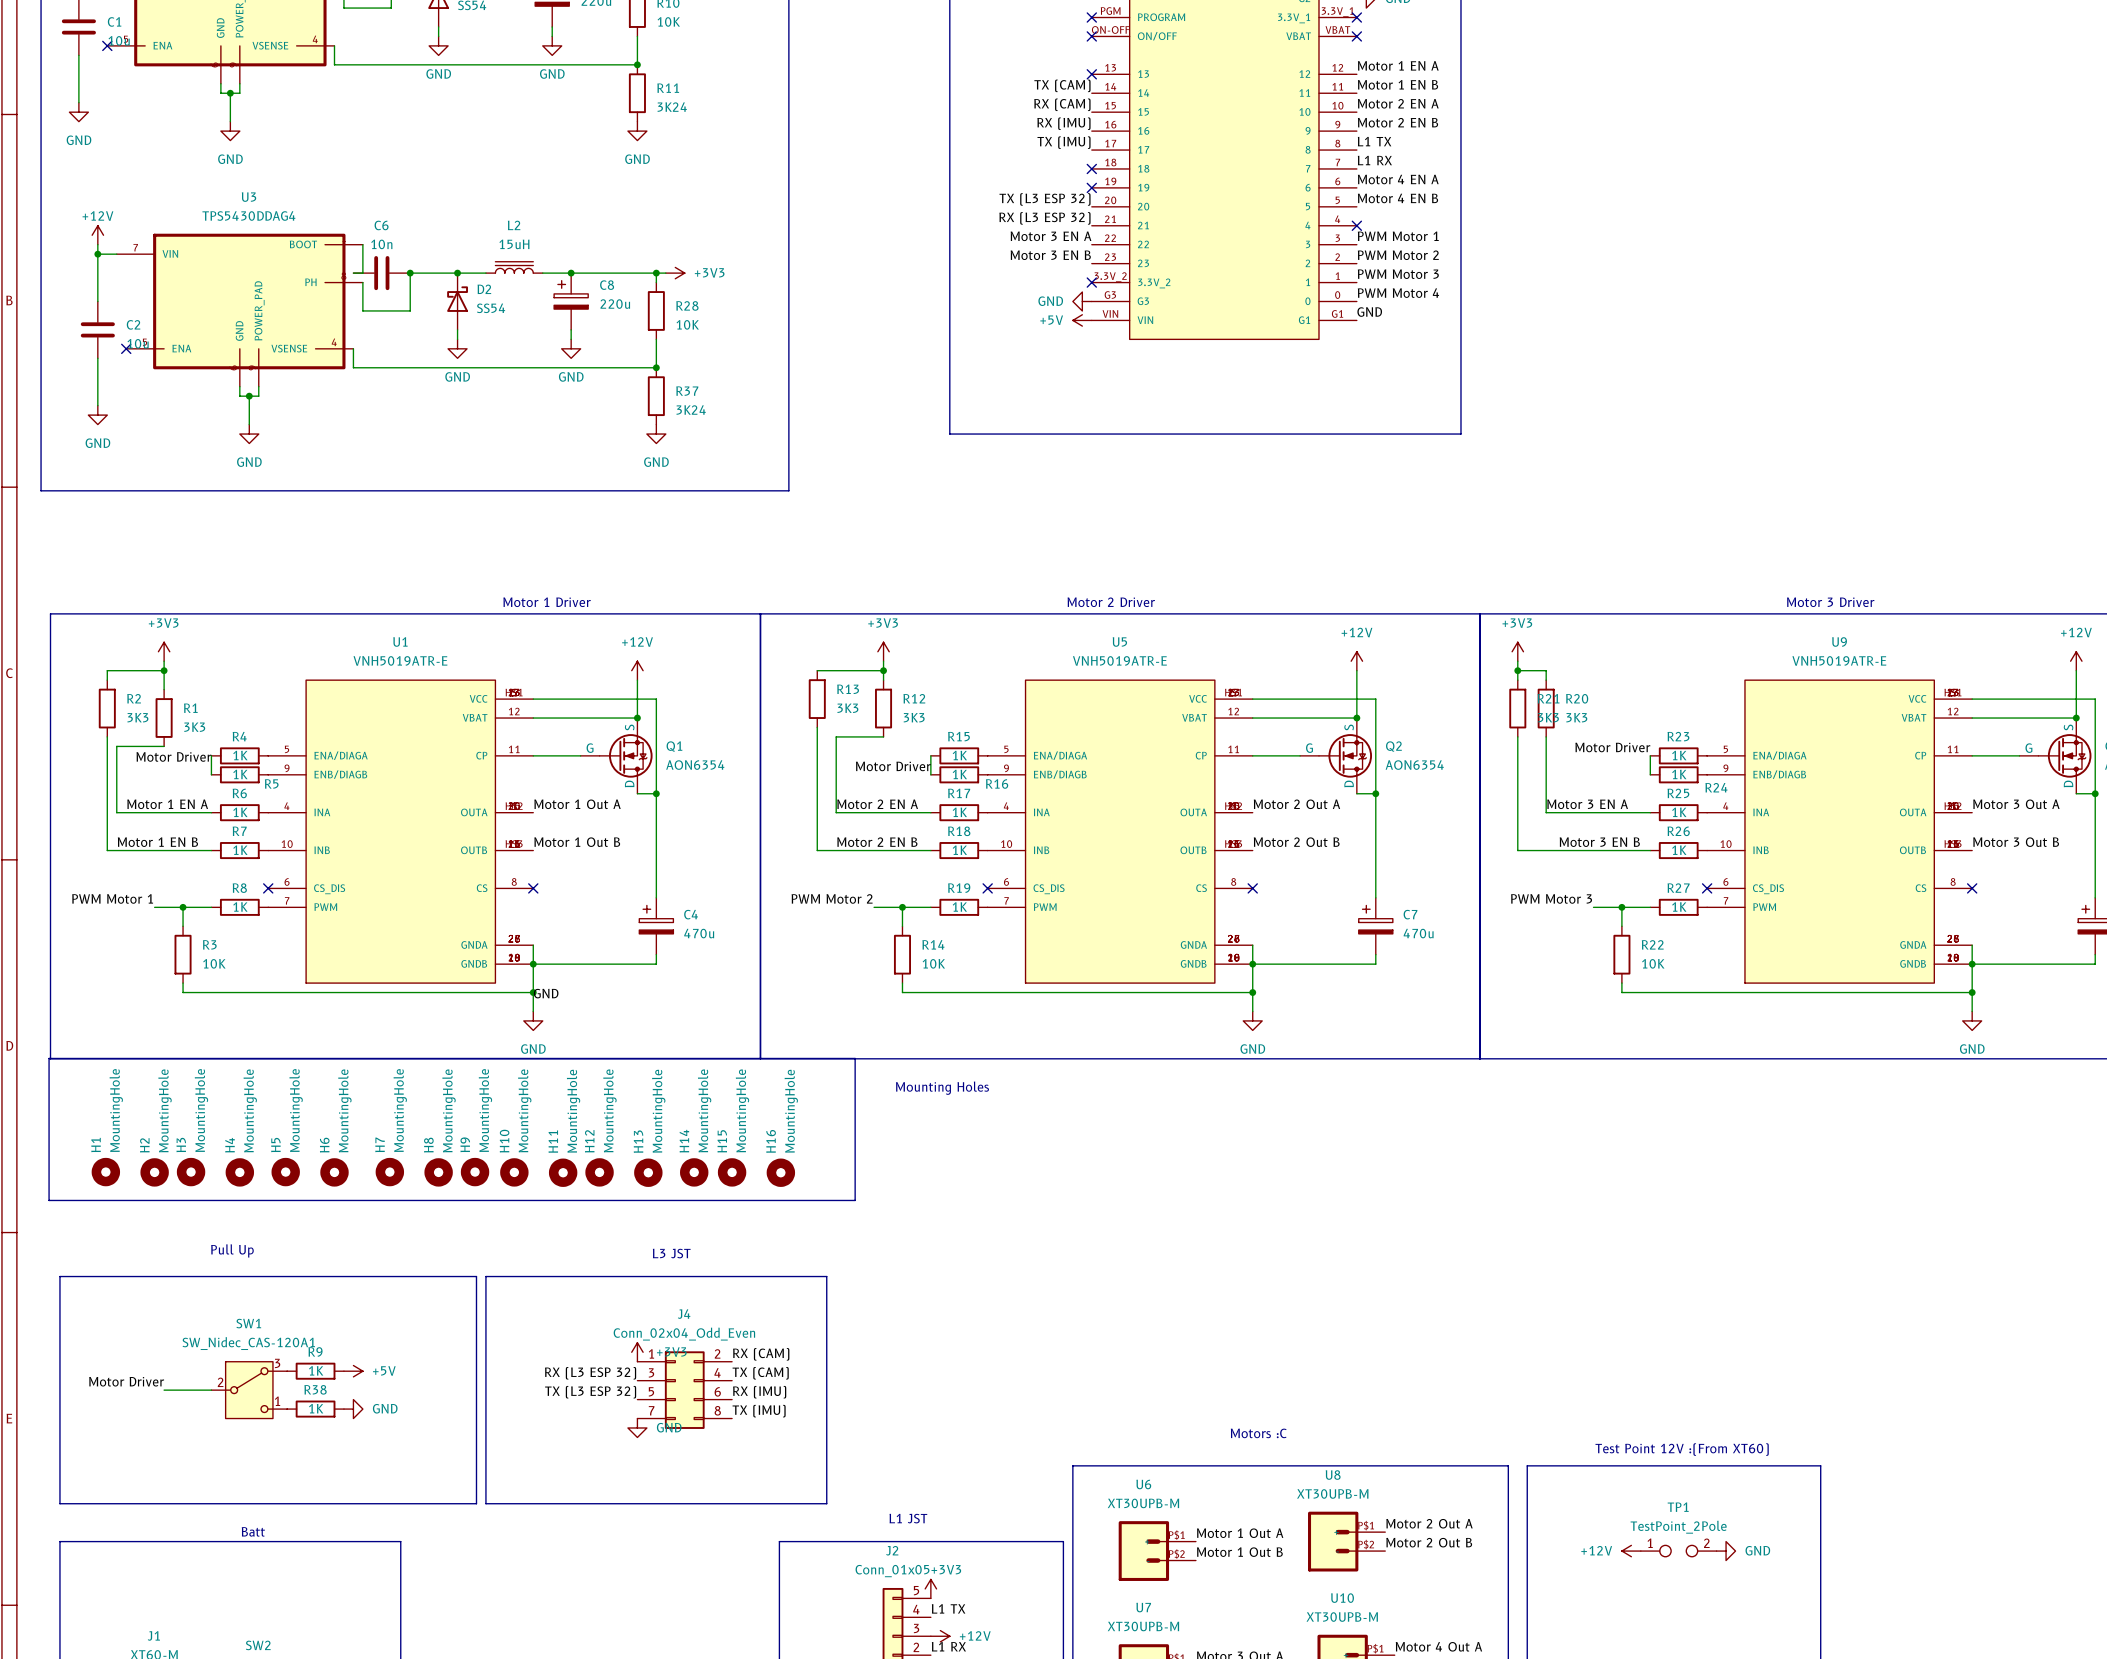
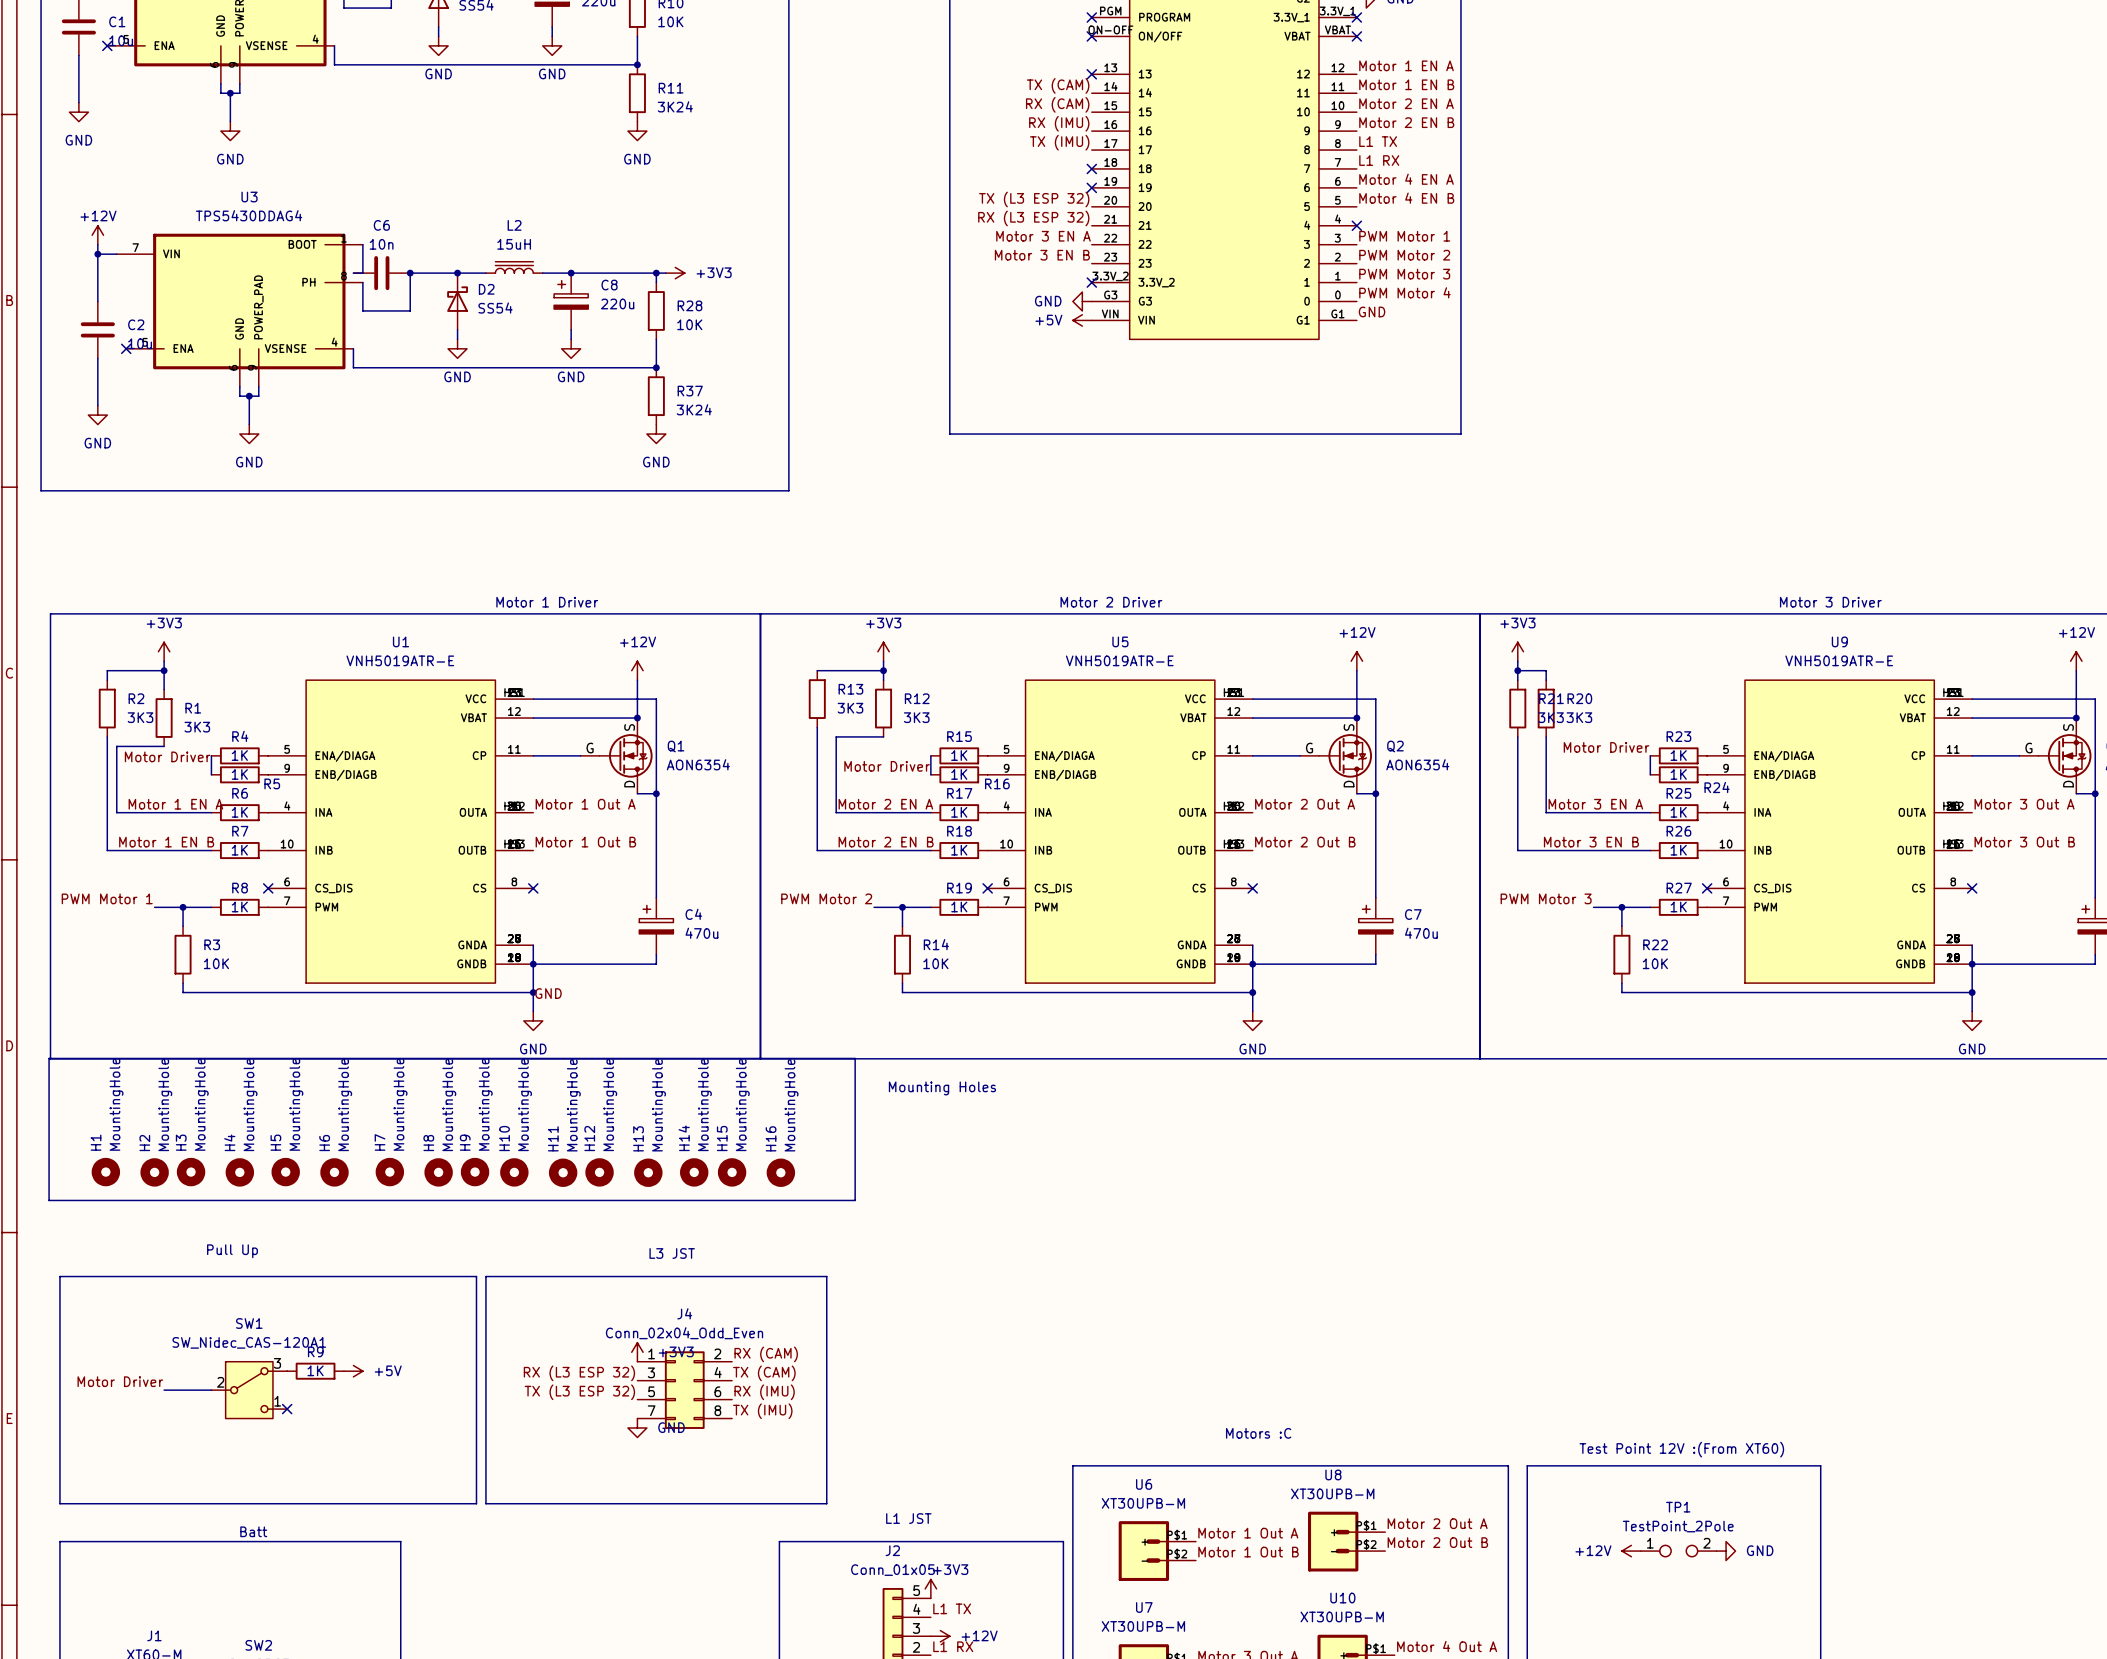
no-connect mark: none -> (287, 1409)
R38: 1K (315, 1409) -> none
power symbol: GND (353, 1409) -> none

